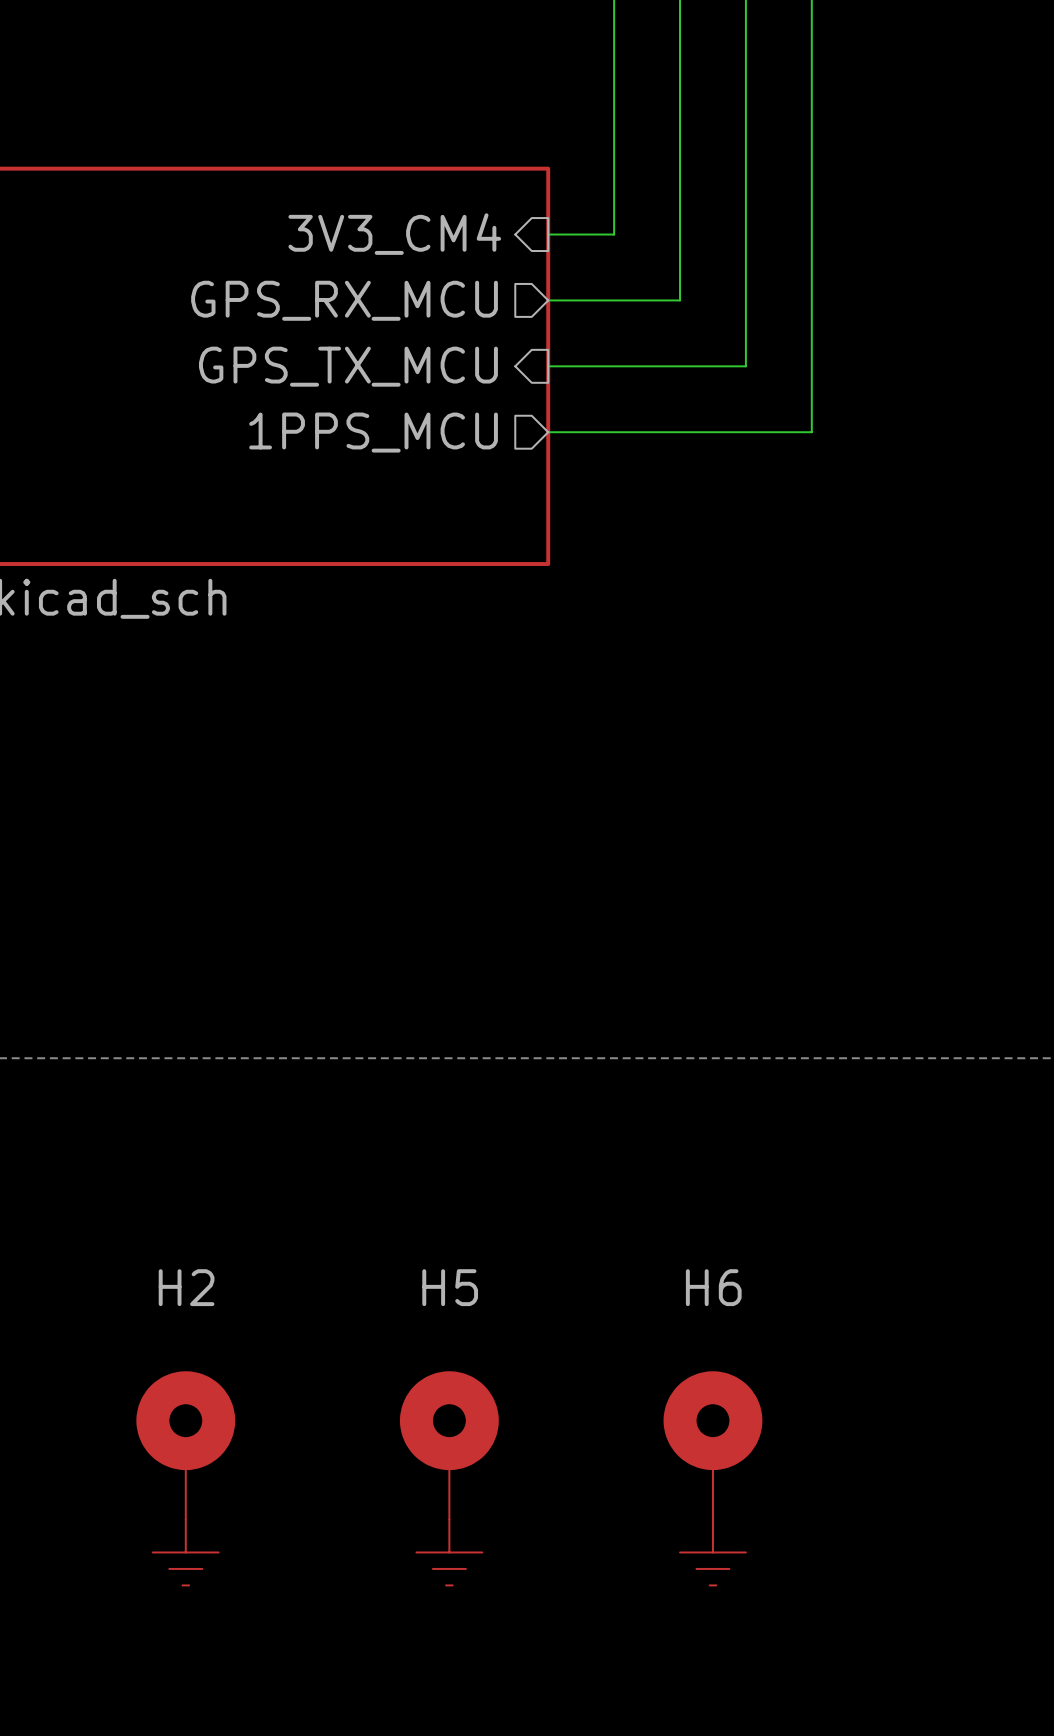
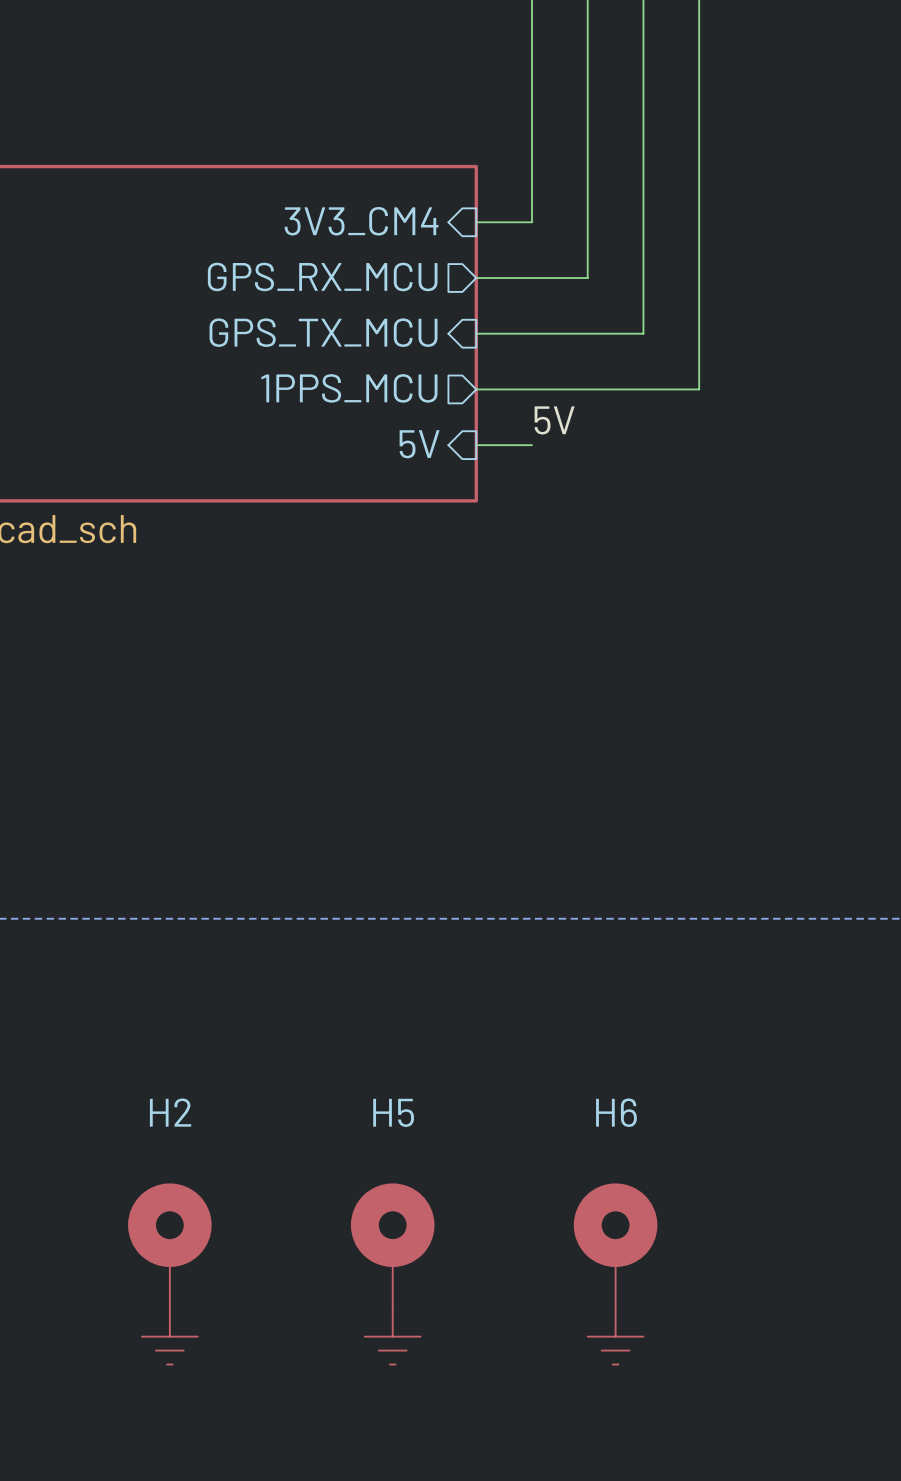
label: none -> 5V (554, 420)
sheet pin: none -> 5V (419, 444)
wire: none -> (476, 445) (532, 445)

